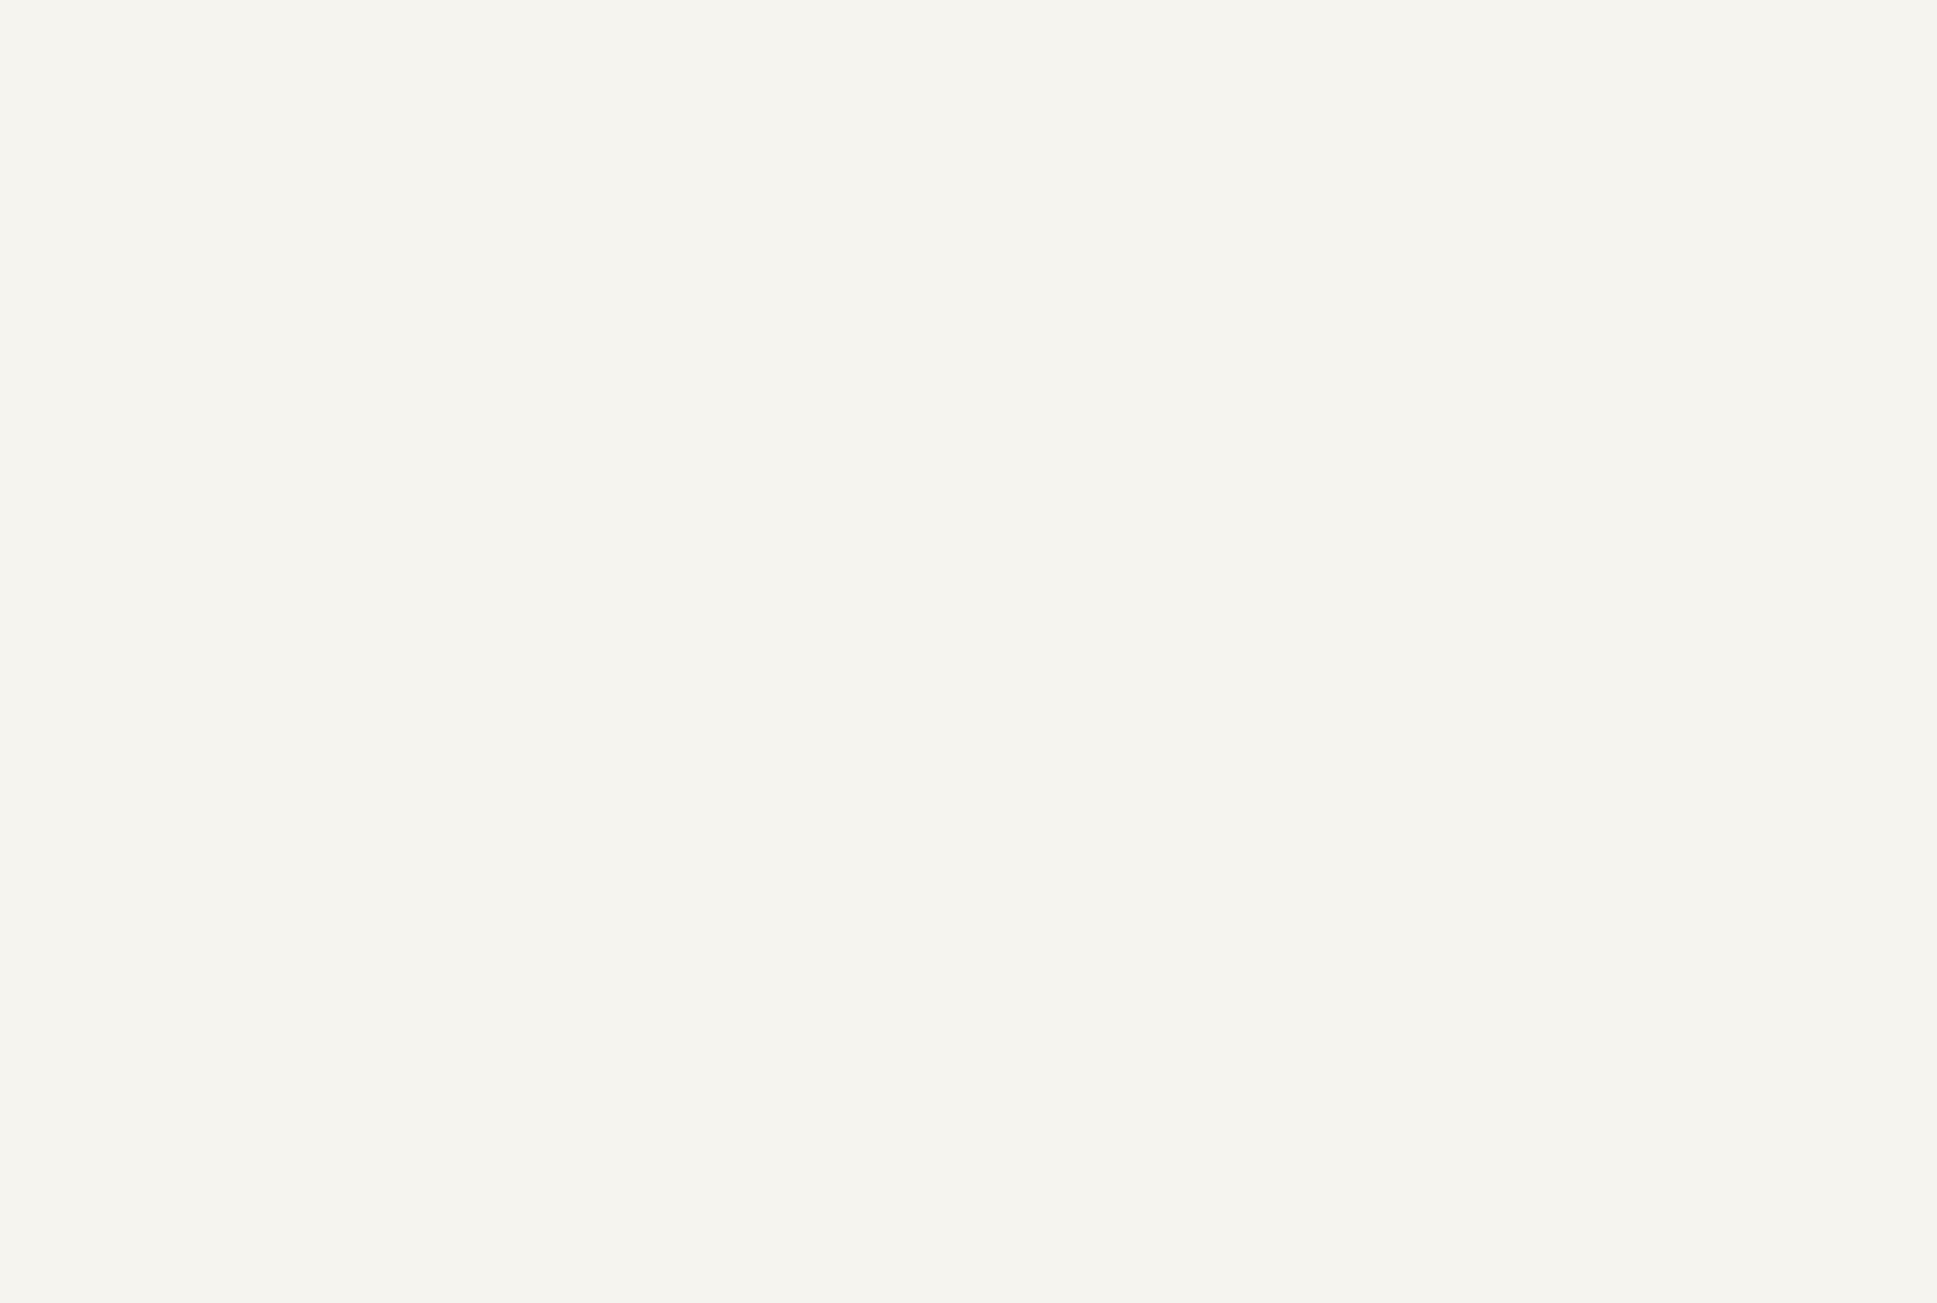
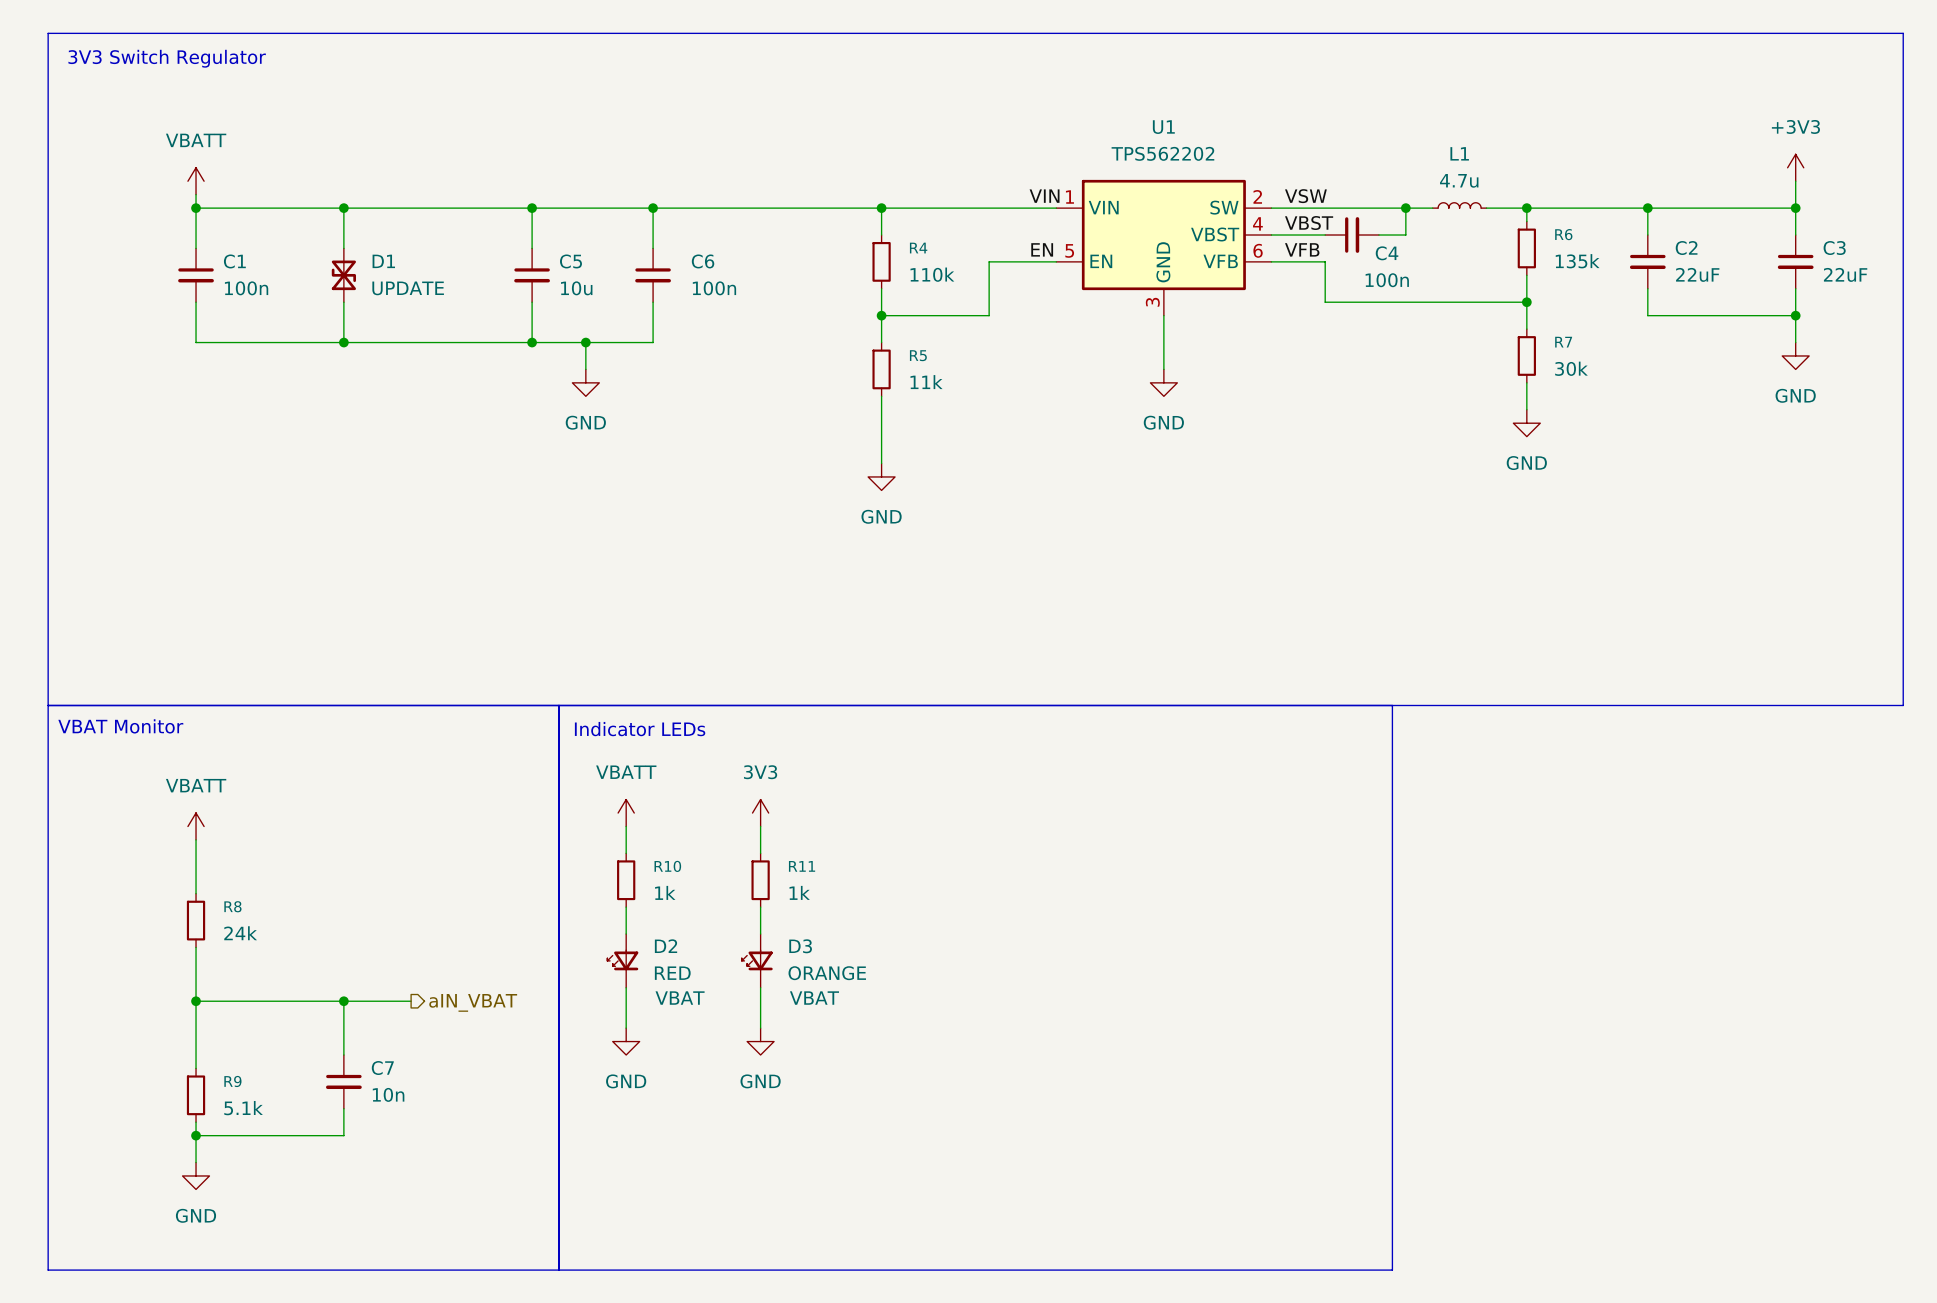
text: none -> 3V3 Switch Regulator (167, 58)
power symbol: none -> +3V3 (1795, 167)
power symbol: none -> VBATT (196, 181)
wire: none -> (1795, 181) (1795, 235)
wire: none -> (196, 194) (196, 248)
label: none -> VIN (1044, 196)
label: none -> VSW (1305, 196)
L1: none -> 4.7u (1459, 205)
wire: none -> (196, 208) (1056, 208)
junction: none -> (196, 208)
wire: none -> (343, 208) (343, 248)
junction: none -> (343, 208)
wire: none -> (532, 208) (532, 248)
junction: none -> (532, 208)
wire: none -> (653, 208) (653, 248)
junction: none -> (653, 208)
wire: none -> (881, 208) (881, 235)
junction: none -> (881, 208)
wire: none -> (1271, 208) (1432, 208)
wire: none -> (1405, 208) (1405, 235) (1378, 235)
junction: none -> (1405, 208)
wire: none -> (1486, 208) (1795, 208)
wire: none -> (1526, 208) (1526, 221)
junction: none -> (1526, 208)
wire: none -> (1647, 208) (1647, 235)
junction: none -> (1647, 208)
junction: none -> (1795, 208)
label: none -> VBST (1309, 223)
wire: none -> (1271, 235) (1325, 235)
C4: none -> 100n (1352, 235)
U1: none -> TPS562202 (1163, 247)
R6: none -> 135k (1526, 248)
label: none -> EN (1042, 249)
label: none -> VFB (1302, 249)
R4: none -> 110k (881, 261)
wire: none -> (1056, 261) (989, 261) (989, 315) (881, 315)
wire: none -> (1271, 261) (1325, 261) (1325, 302) (1526, 302)
C2: none -> 22uF (1647, 261)
C3: none -> 22uF (1795, 261)
C1: none -> 100n (196, 275)
D1: none -> UPDATE (343, 275)
C5: none -> 10u (532, 275)
C6: none -> 100n (653, 275)
wire: none -> (1526, 275) (1526, 329)
wire: none -> (881, 288) (881, 342)
wire: none -> (1647, 288) (1647, 315) (1795, 315)
wire: none -> (1795, 288) (1795, 342)
wire: none -> (196, 302) (196, 342) (653, 342) (653, 302)
wire: none -> (343, 302) (343, 342)
wire: none -> (532, 302) (532, 342)
junction: none -> (1526, 302)
junction: none -> (881, 315)
wire: none -> (1163, 315) (1163, 369)
junction: none -> (1795, 315)
junction: none -> (343, 342)
junction: none -> (532, 342)
wire: none -> (585, 342) (585, 369)
junction: none -> (585, 342)
R7: none -> 30k (1526, 355)
power symbol: none -> GND (1795, 355)
R5: none -> 11k (881, 369)
power symbol: none -> GND (585, 382)
power symbol: none -> GND (1163, 382)
wire: none -> (1526, 382) (1526, 409)
wire: none -> (881, 396) (881, 463)
power symbol: none -> GND (1526, 423)
power symbol: none -> GND (881, 476)
line: none -> (48, 705) (1903, 705) (1903, 33) (48, 33) (48, 1270) (1392, 1270) (1392, 705)
line: none -> (558, 705) (558, 1270)
text: none -> VBAT Monitor (120, 726)
text: none -> Indicator LEDs (640, 729)
power symbol: none -> VBATT (626, 813)
power symbol: none -> 3V3 (760, 813)
power symbol: none -> VBATT (196, 826)
wire: none -> (626, 826) (626, 853)
wire: none -> (760, 826) (760, 853)
wire: none -> (196, 839) (196, 893)
R10: none -> 1k (626, 880)
R11: none -> 1k (760, 880)
wire: none -> (626, 907) (626, 934)
wire: none -> (760, 907) (760, 934)
R8: none -> 24k (196, 920)
wire: none -> (196, 947) (196, 1068)
D2: none -> RED (622, 960)
D3: none -> ORANGE (757, 960)
wire: none -> (626, 987) (626, 1028)
wire: none -> (760, 987) (760, 1028)
wire: none -> (196, 1001) (411, 1001)
junction: none -> (196, 1001)
wire: none -> (343, 1001) (343, 1055)
junction: none -> (343, 1001)
hierarchical label: none -> aIN_VBAT (473, 1002)
power symbol: none -> GND (626, 1041)
power symbol: none -> GND (760, 1041)
C7: none -> 10n (343, 1081)
R9: none -> 5.1k (196, 1095)
wire: none -> (343, 1108) (343, 1135) (196, 1135)
wire: none -> (196, 1122) (196, 1162)
junction: none -> (196, 1135)
power symbol: none -> GND (196, 1175)

